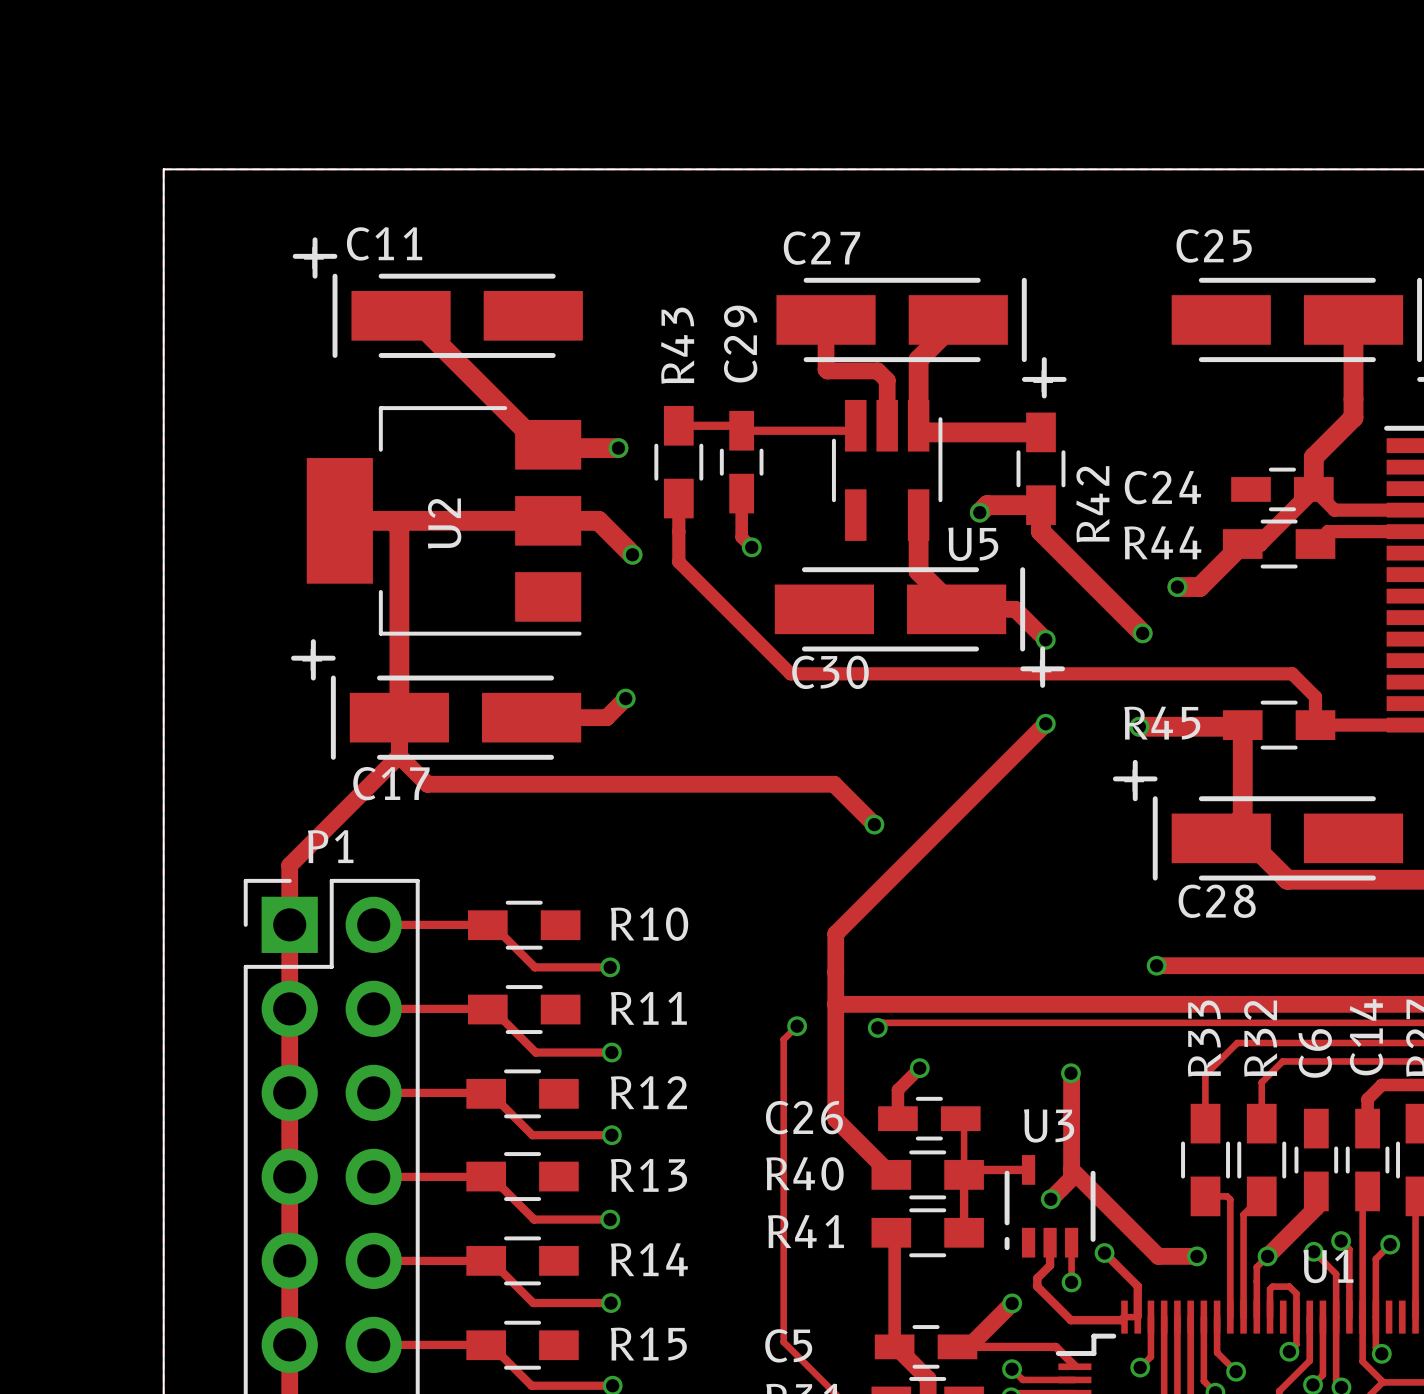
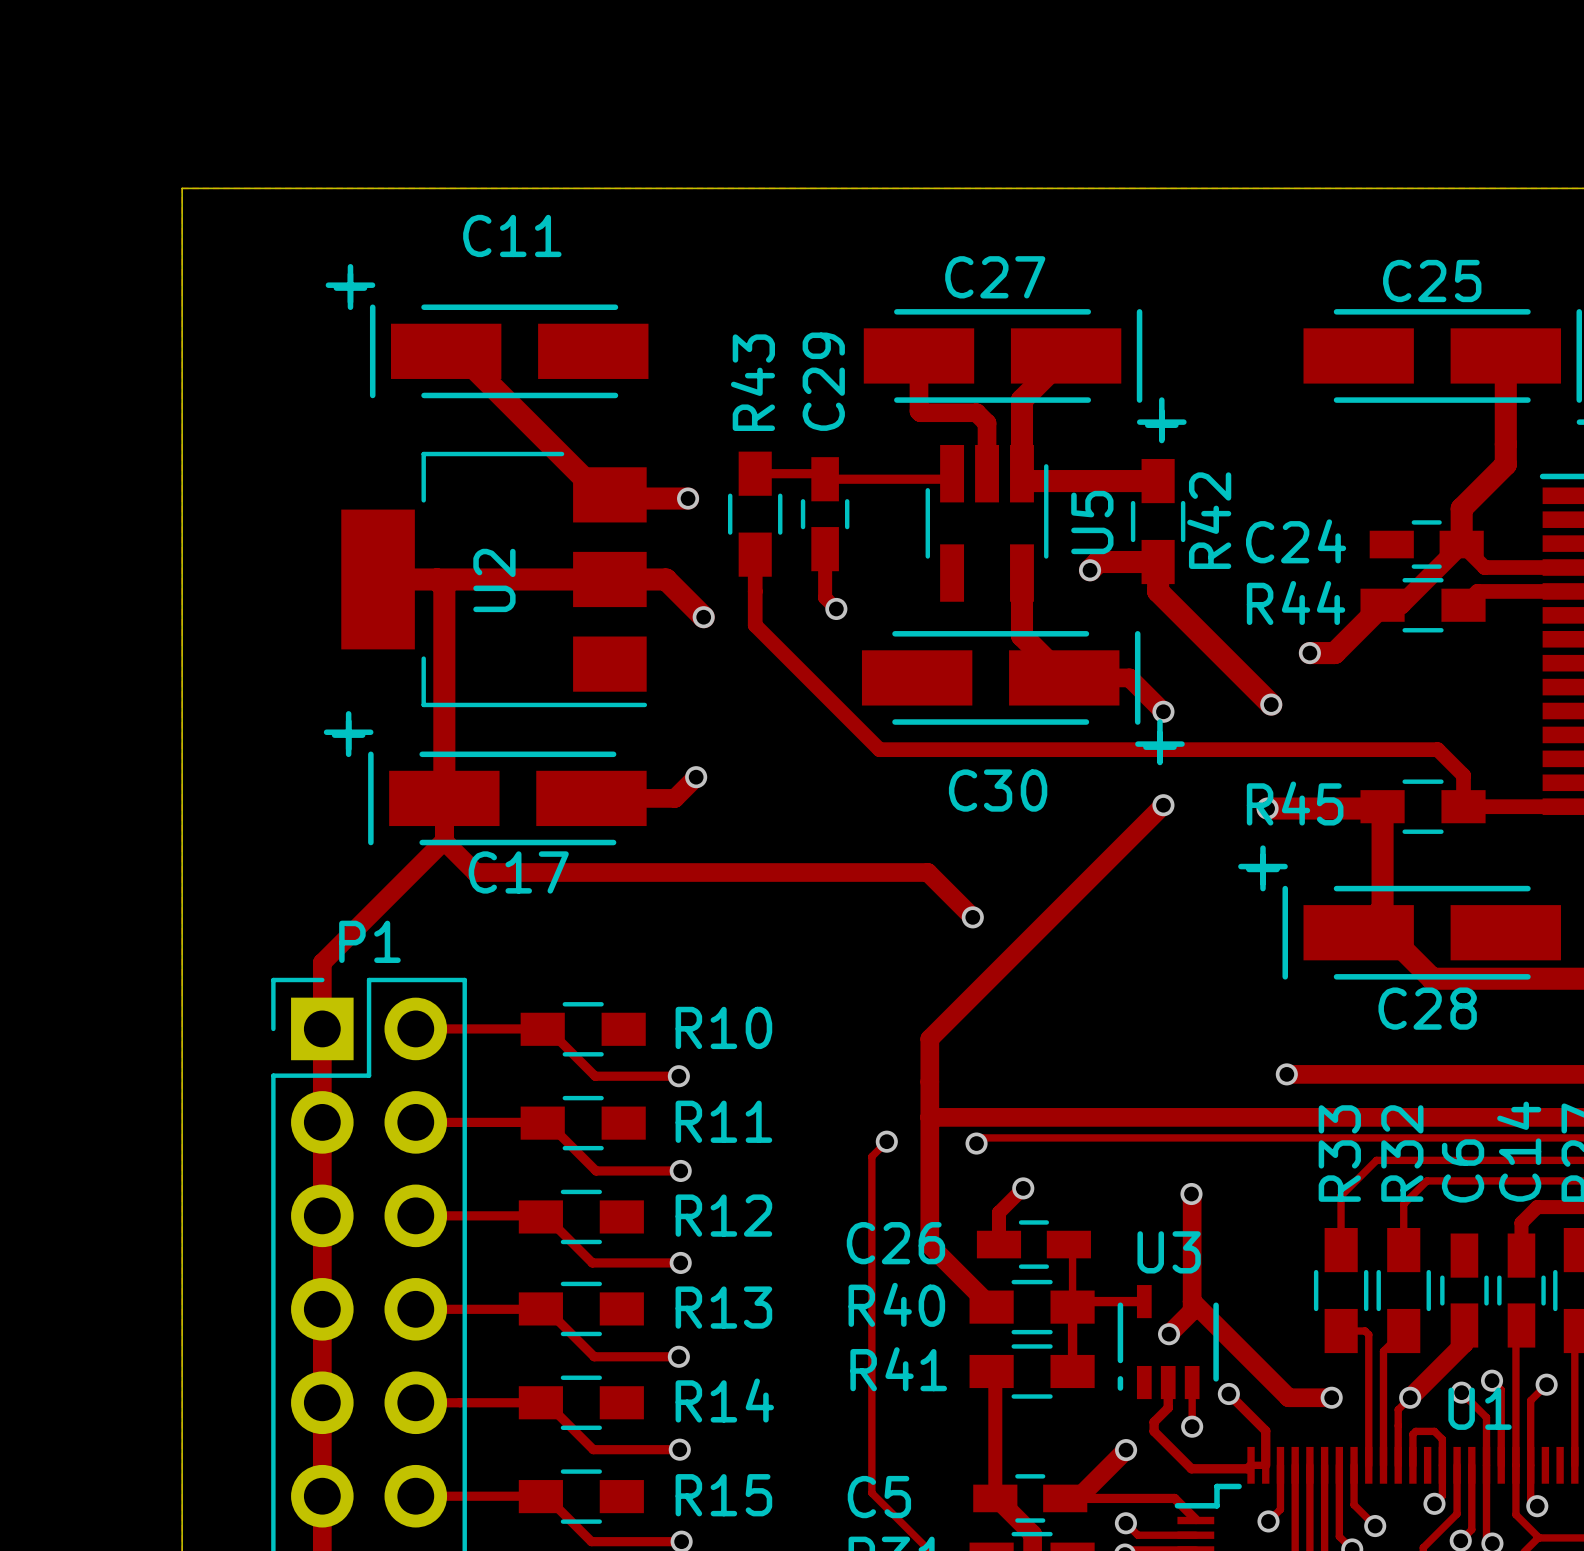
C11 name position: C11 (384, 243) -> C11 (512, 235)
C25 name position: C25 (1214, 246) -> C25 (1432, 280)
C27 name position: C27 (821, 248) -> C27 (995, 277)
R42 name position: R42 (1092, 504) -> R42 (1209, 520)
U5 name rotation: 0° (973, 544) -> 90° counterclockwise (1092, 522)
C30 name position: C30 (830, 672) -> C30 (998, 790)
C17 name position: C17 (391, 783) -> C17 (518, 872)
C28 name position: C28 (1217, 901) -> C28 (1427, 1008)

